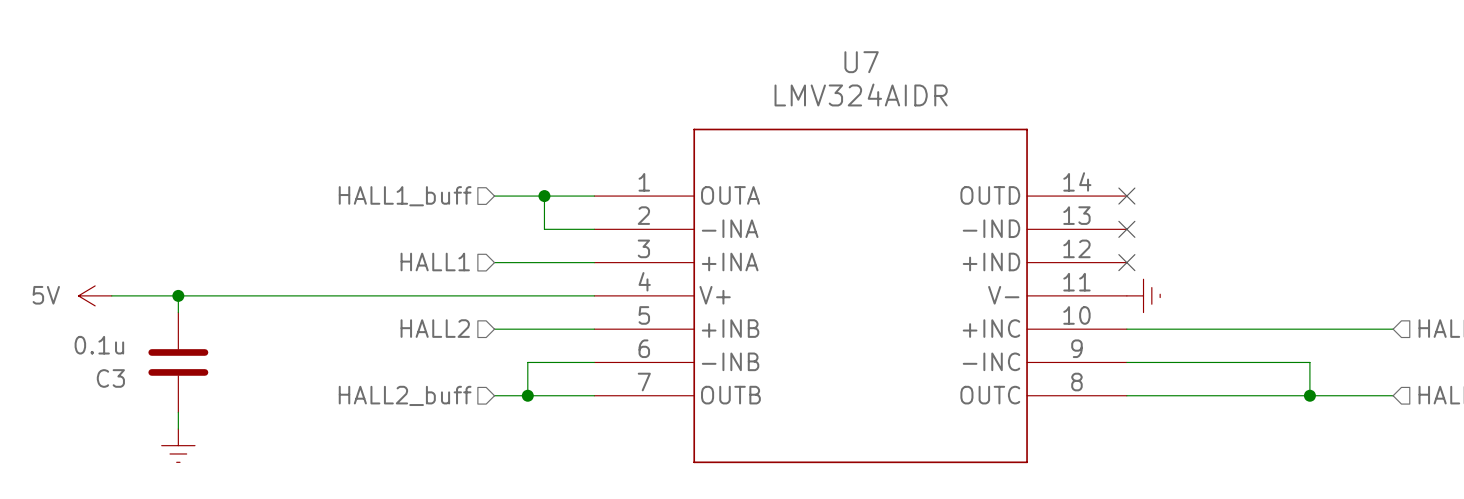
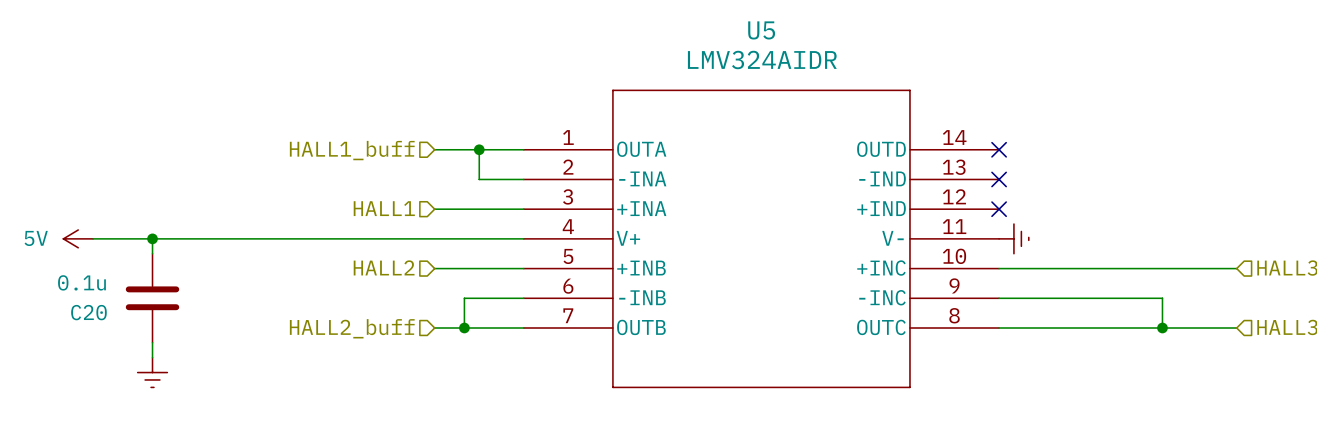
U7 name: U7 (861, 62) -> U5 (761, 30)
C3 name: C3 (110, 378) -> C20 (88, 312)

